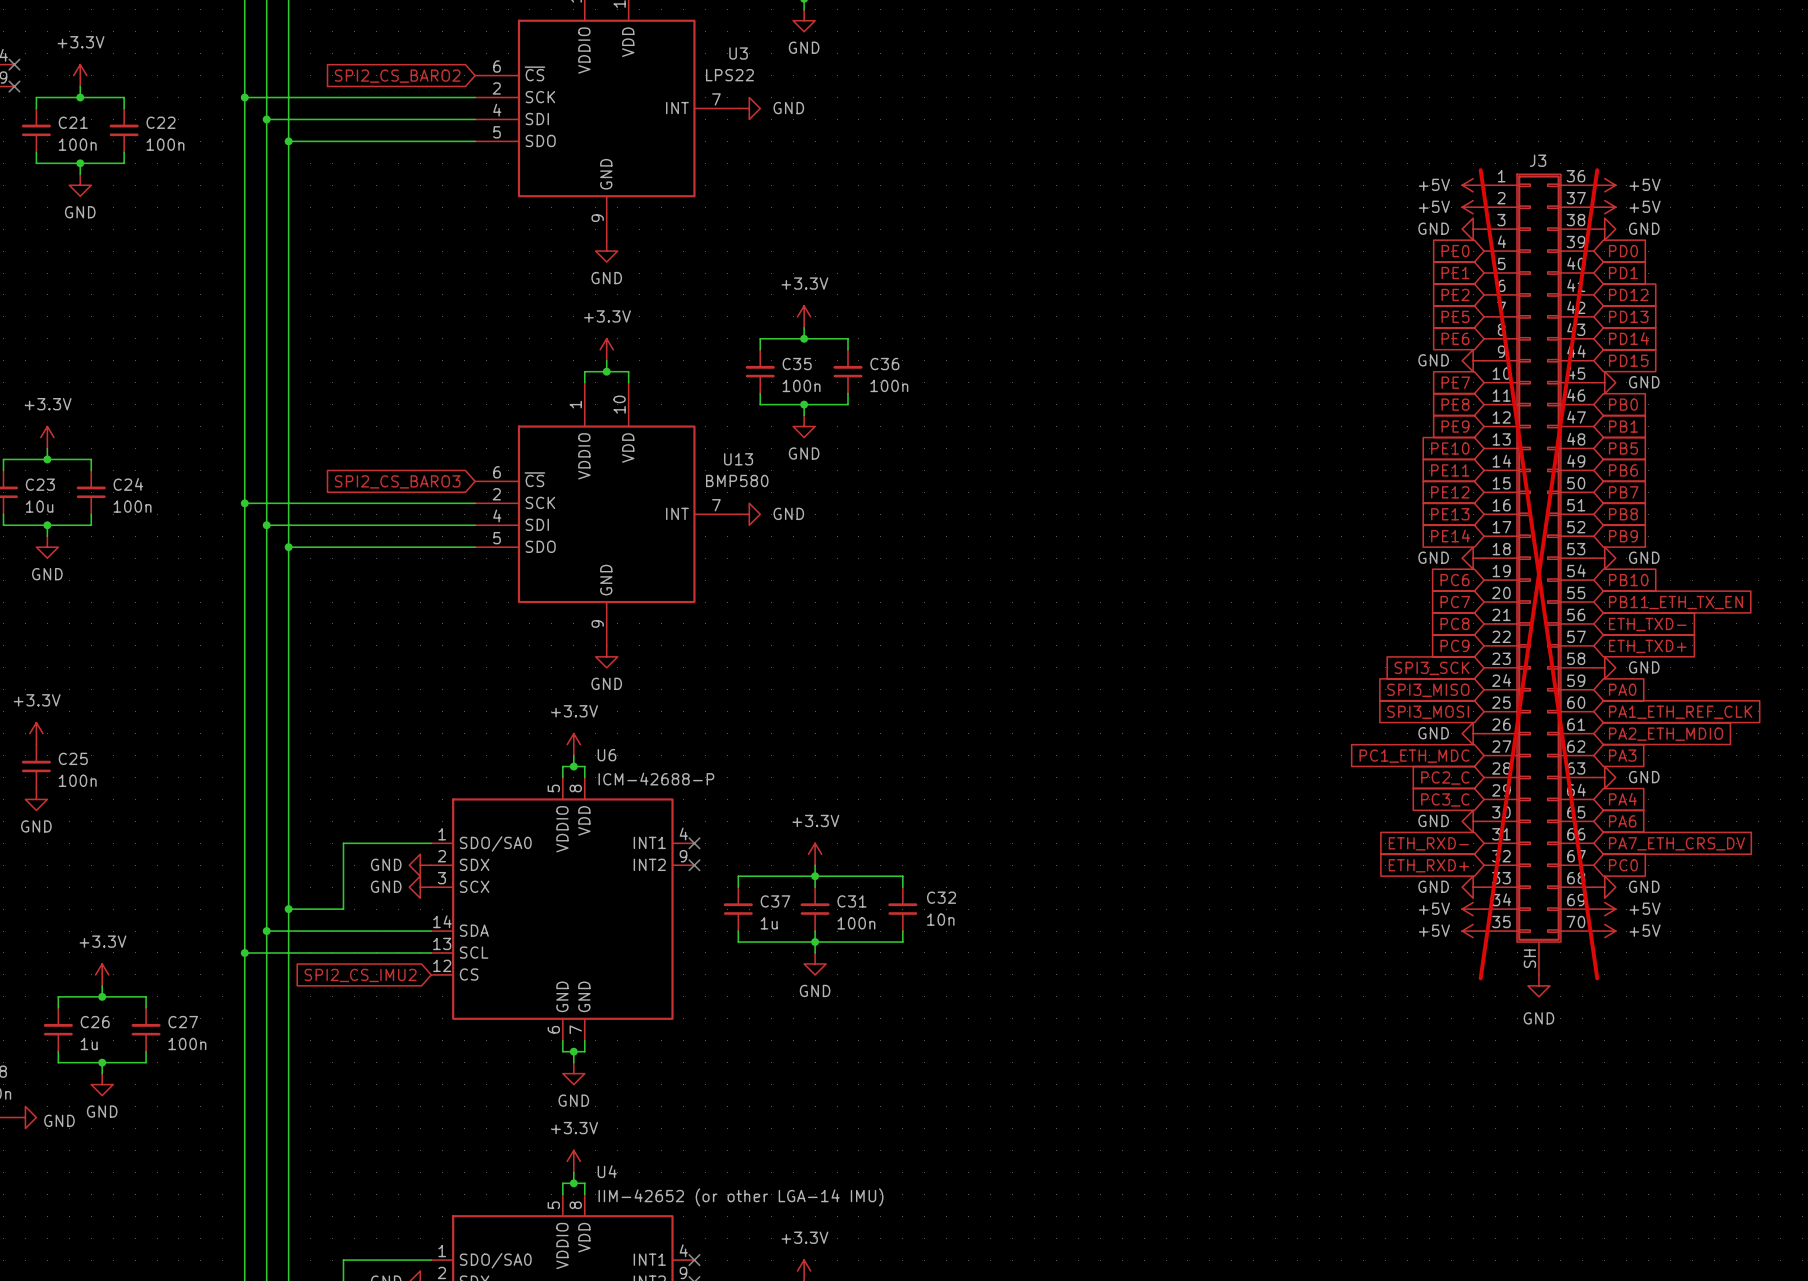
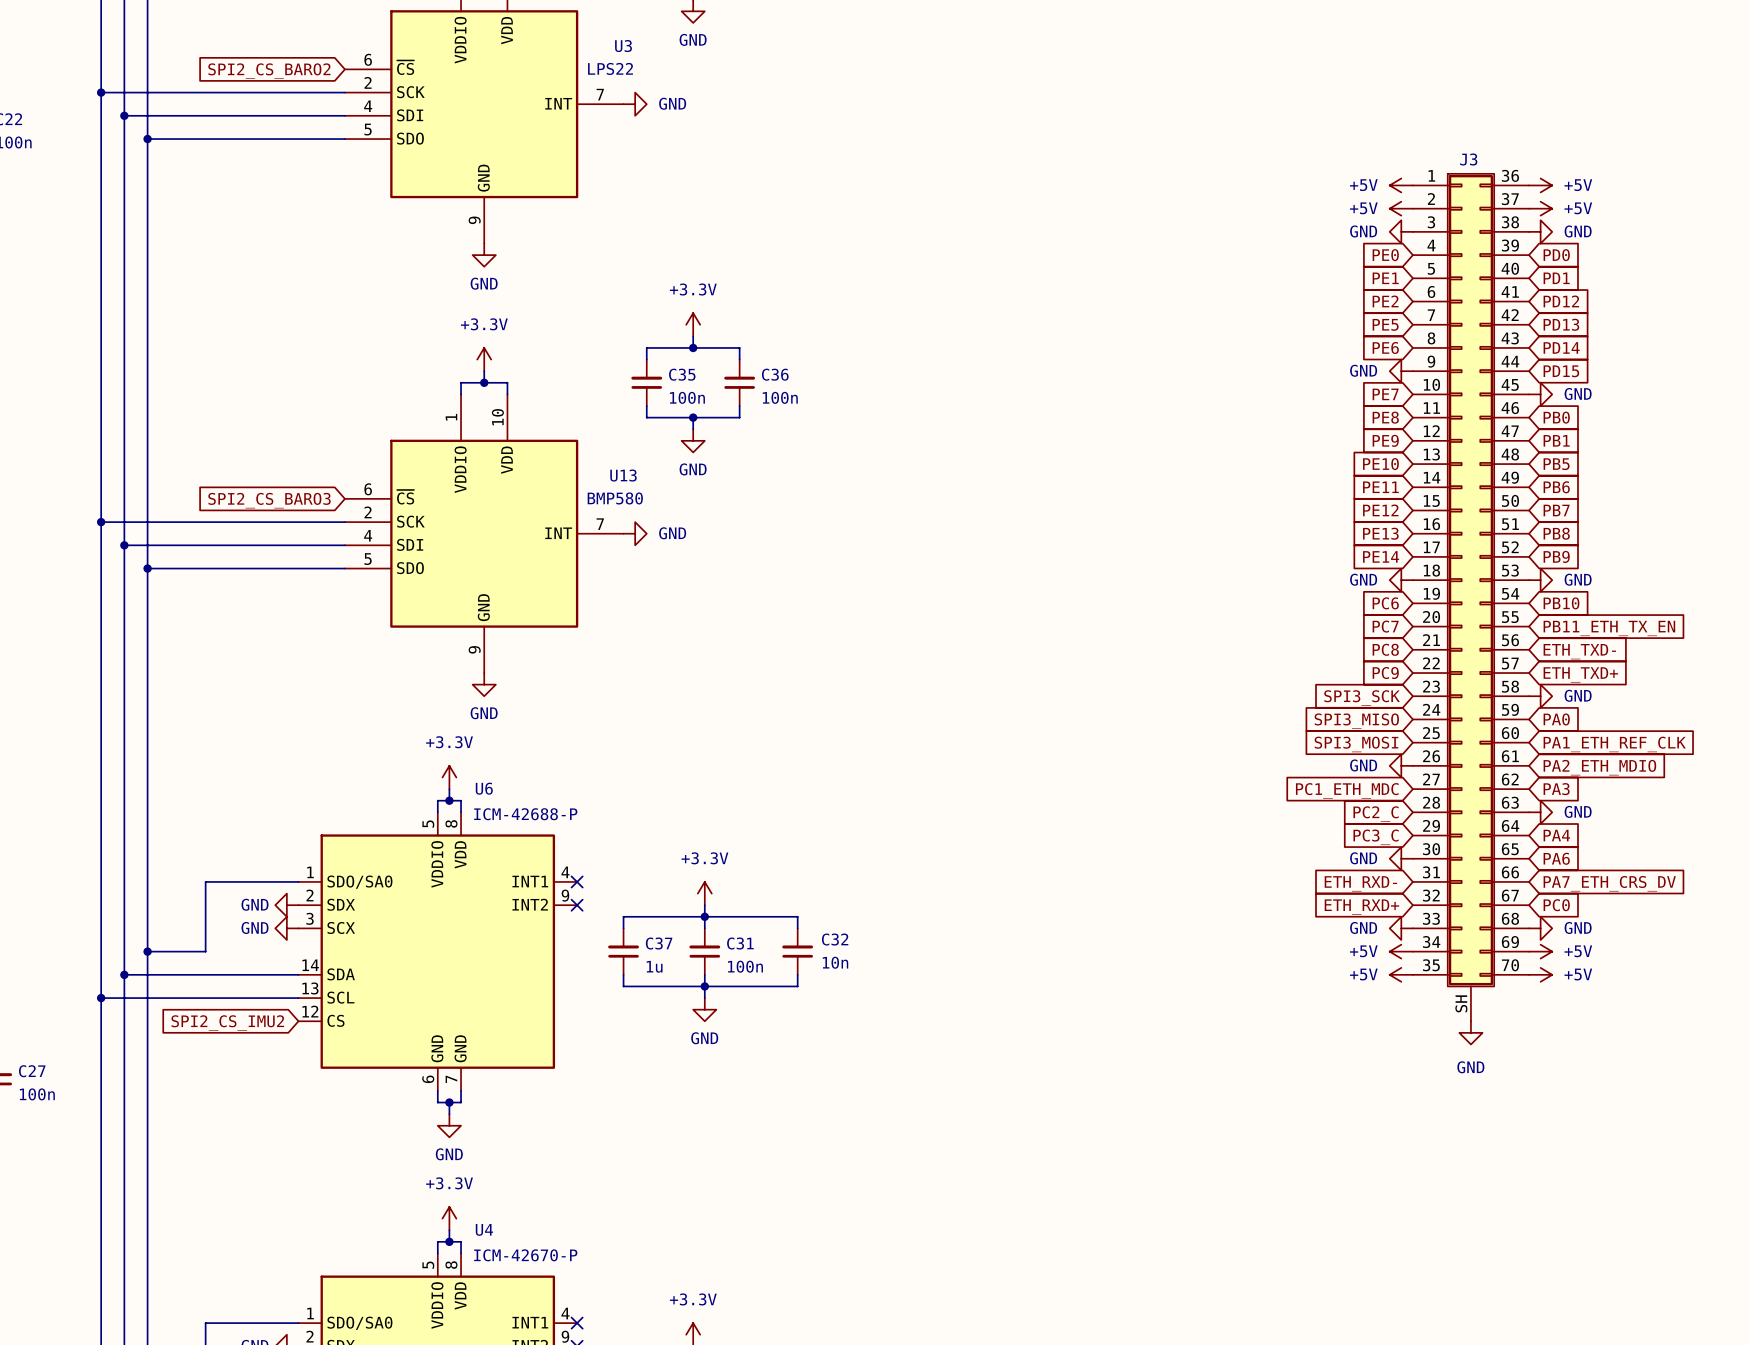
J3 do-not-place cross: (1538, 574) -> none
U4 value: IIM-42652 (or other LGA-14 IMU) (741, 1197) -> ICM-42670-P (525, 1255)

